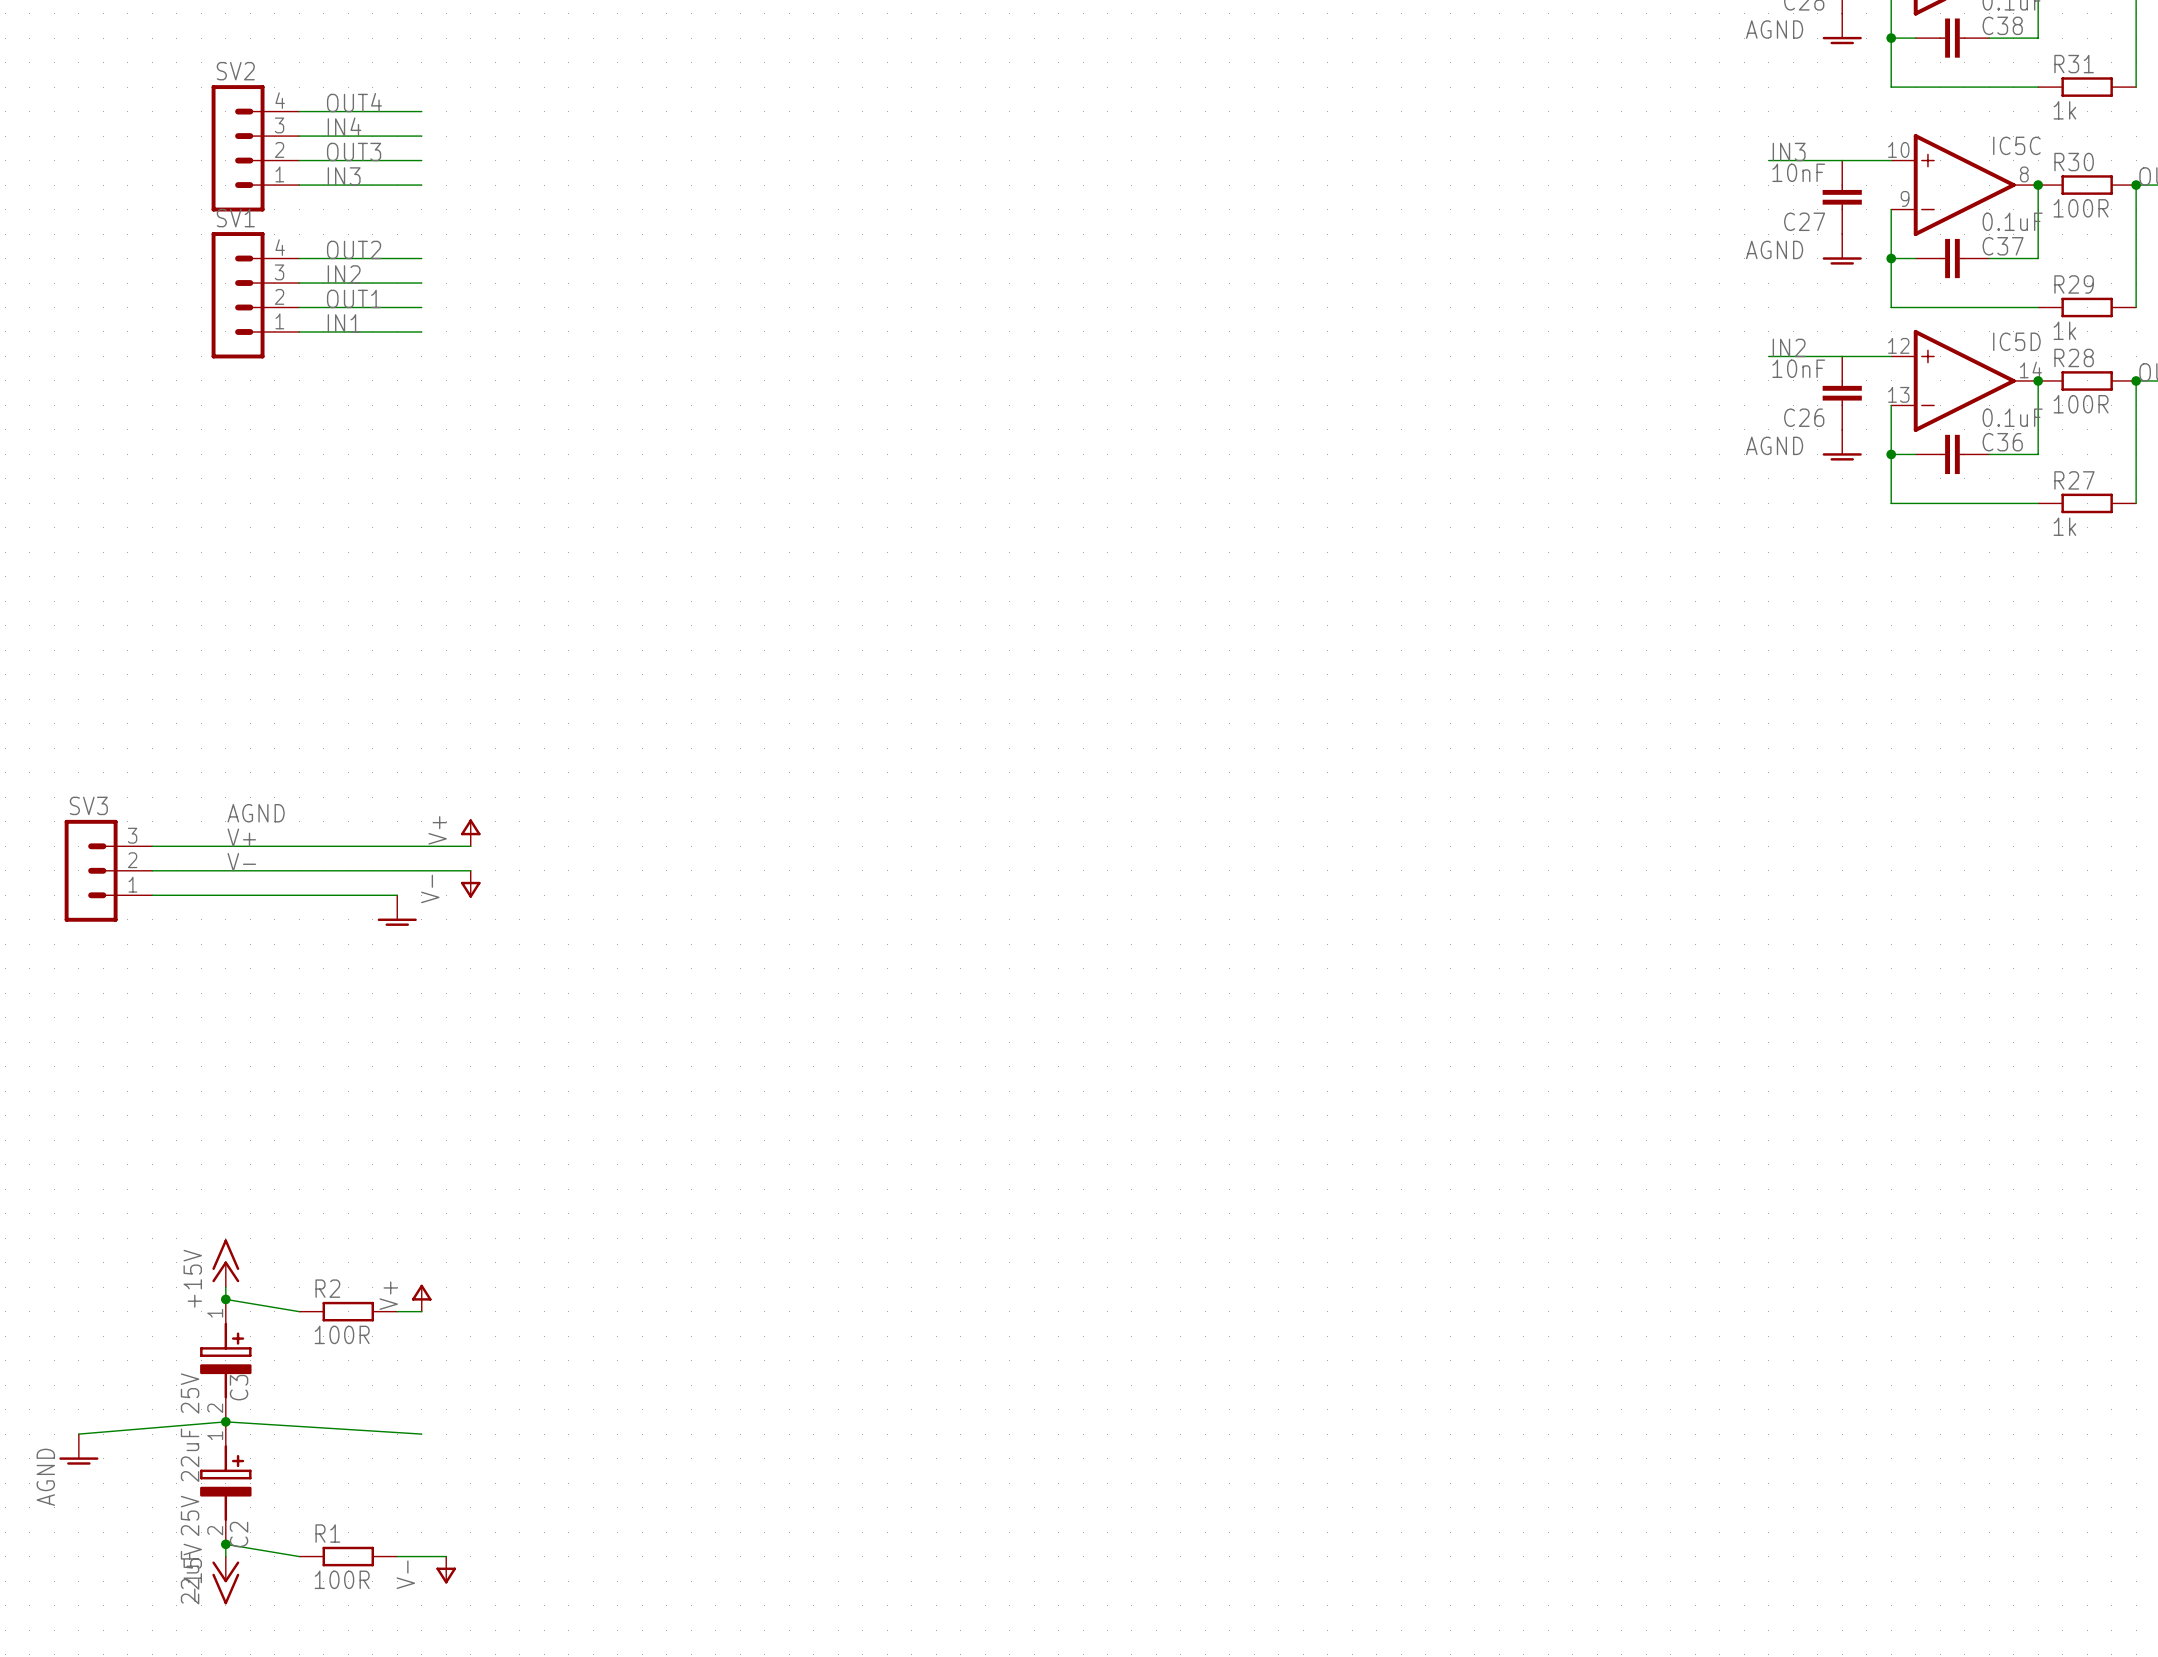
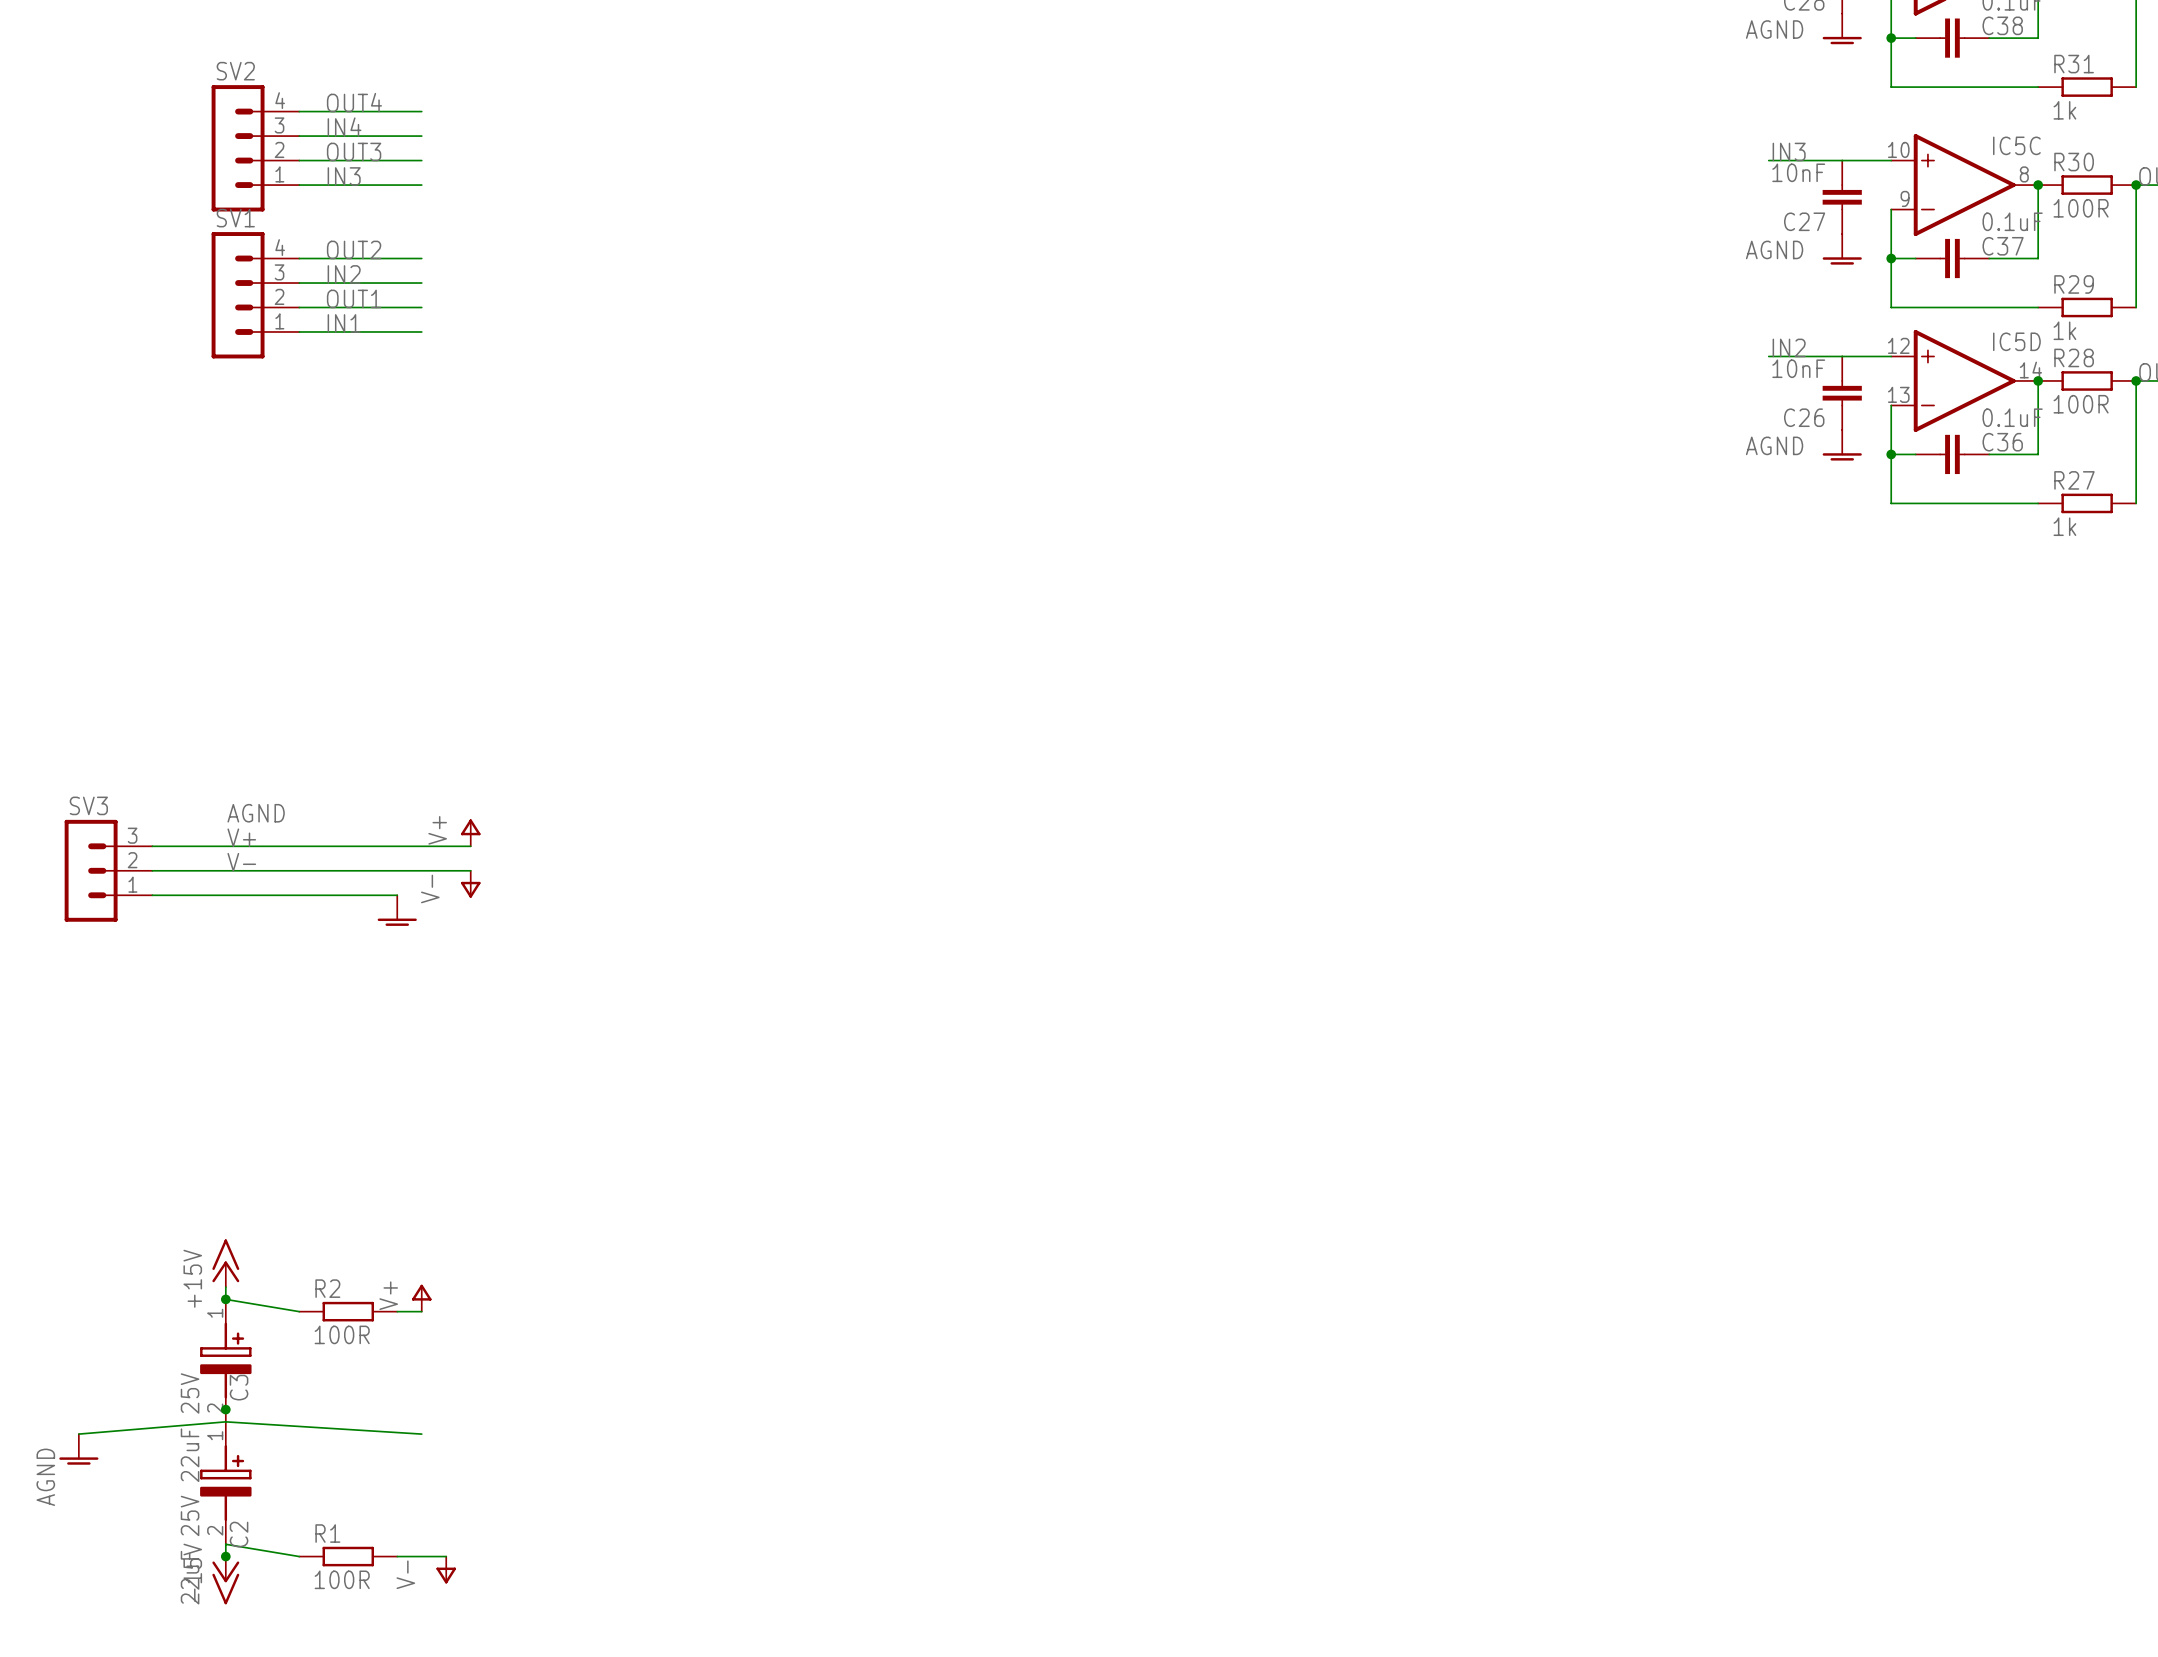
junction position: (225, 1421) -> (225, 1409)
junction position: (225, 1544) -> (225, 1556)

